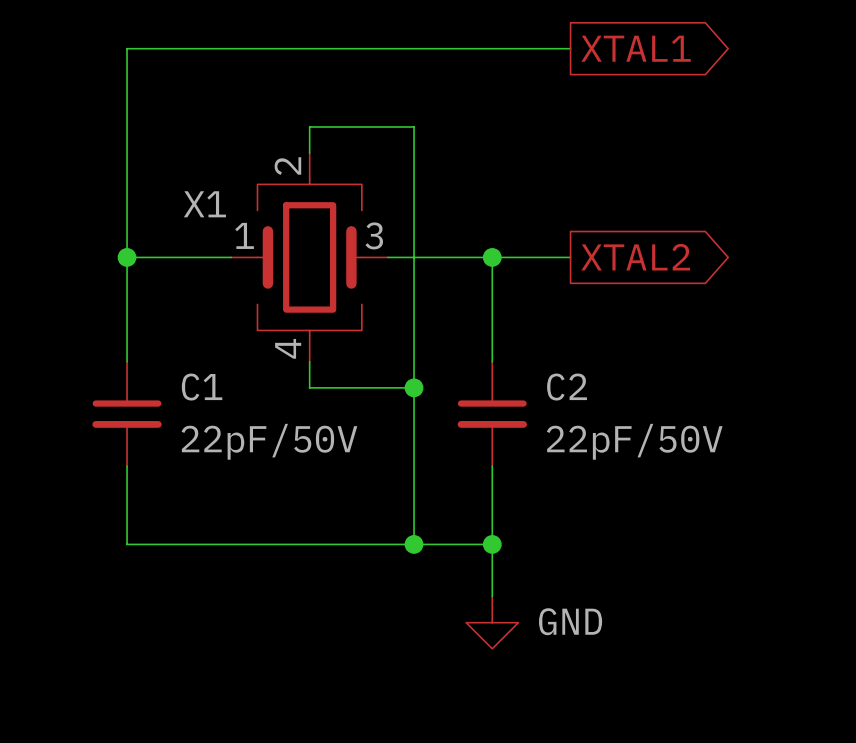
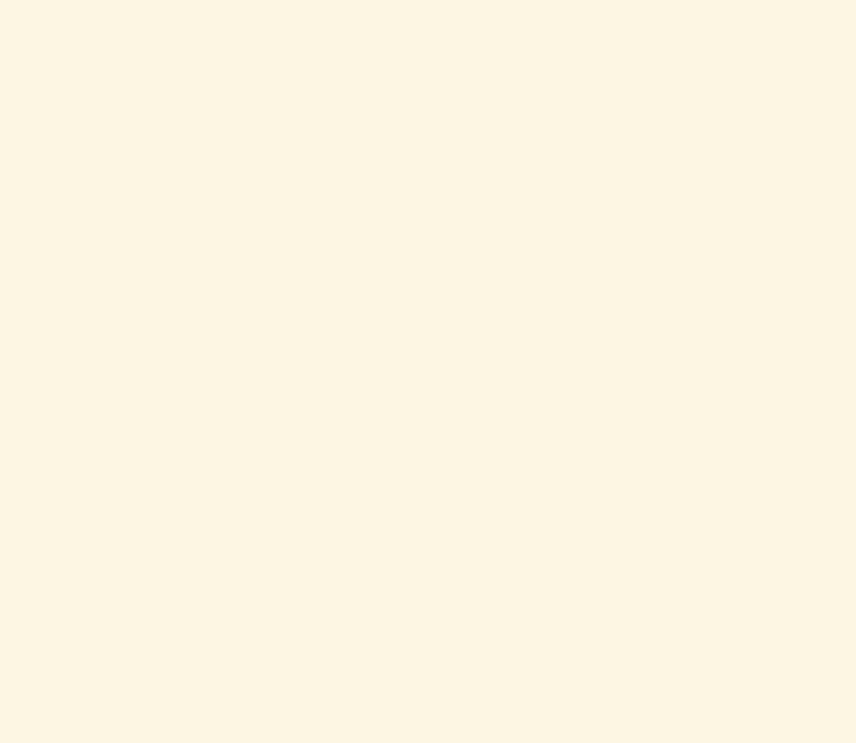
wire: (570, 48) (127, 48) (127, 361) -> none
global label: XTAL1 (636, 48) -> none
wire: (309, 153) (309, 126) (414, 126) (414, 544) -> none
wire: (127, 257) (231, 257) -> none
junction: (127, 257) -> none
X1: (309, 257) -> none
wire: (387, 257) (570, 257) -> none
wire: (492, 257) (492, 361) -> none
junction: (492, 257) -> none
global label: XTAL2 (635, 257) -> none
wire: (309, 361) (309, 387) (414, 387) -> none
junction: (414, 387) -> none
C1: 22pF/50V (127, 413) -> none
C2: 22pF/50V (492, 413) -> none
wire: (127, 466) (127, 544) (492, 544) -> none
wire: (492, 466) (492, 596) -> none
junction: (414, 544) -> none
junction: (492, 544) -> none
power symbol: GND (492, 622) -> none

